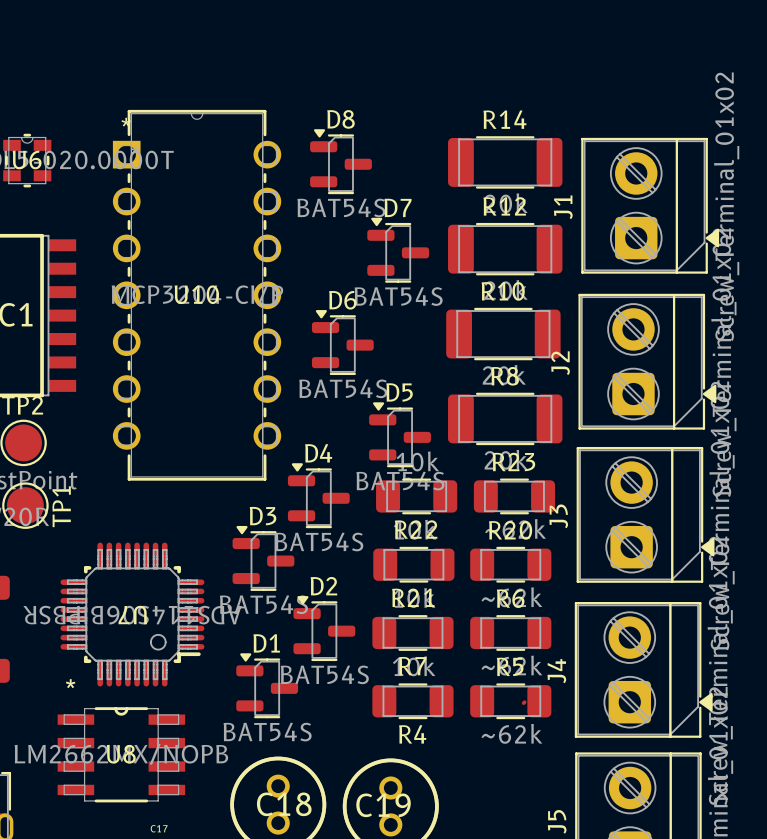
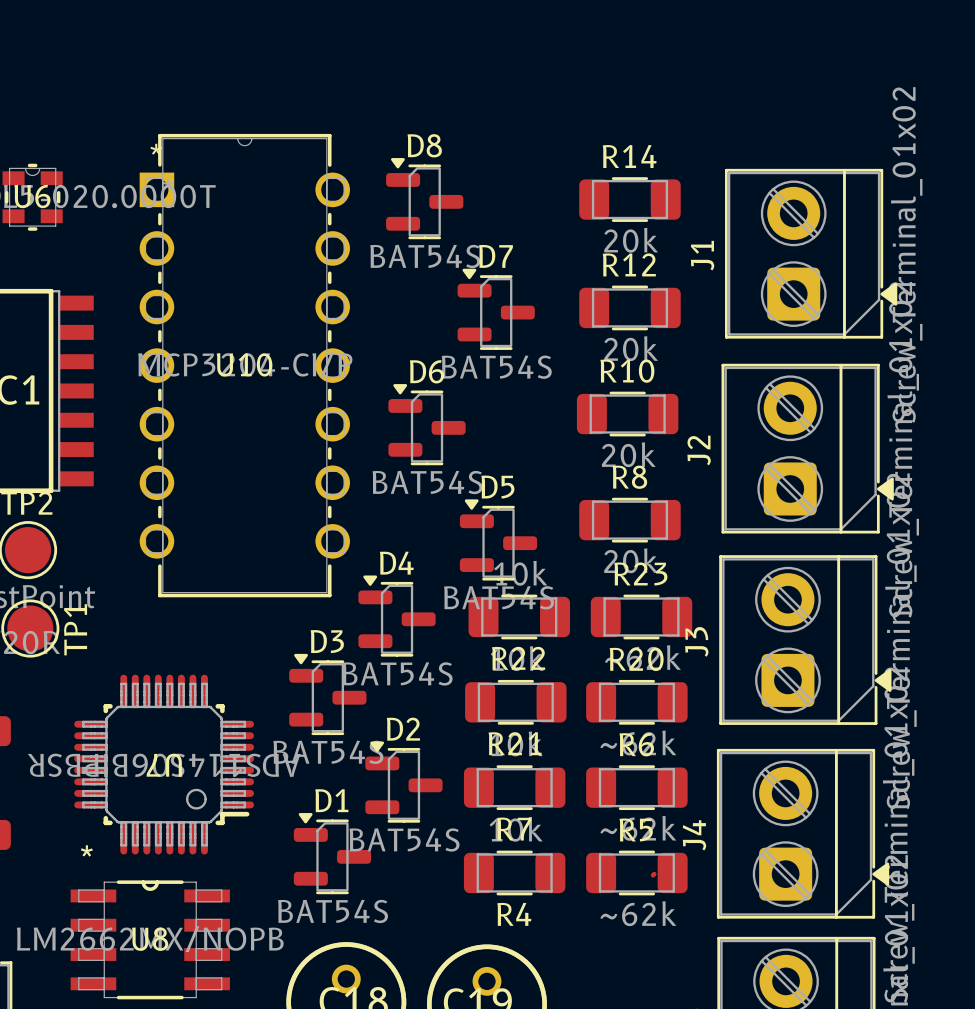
R14 footprint: [448, 136, 563, 189] -> [579, 177, 681, 222]
R12 footprint: [448, 222, 563, 276] -> [579, 285, 681, 331]
R10 footprint: [446, 307, 561, 361] -> [576, 391, 679, 437]
R8 footprint: [448, 392, 563, 446] -> [579, 497, 681, 543]

